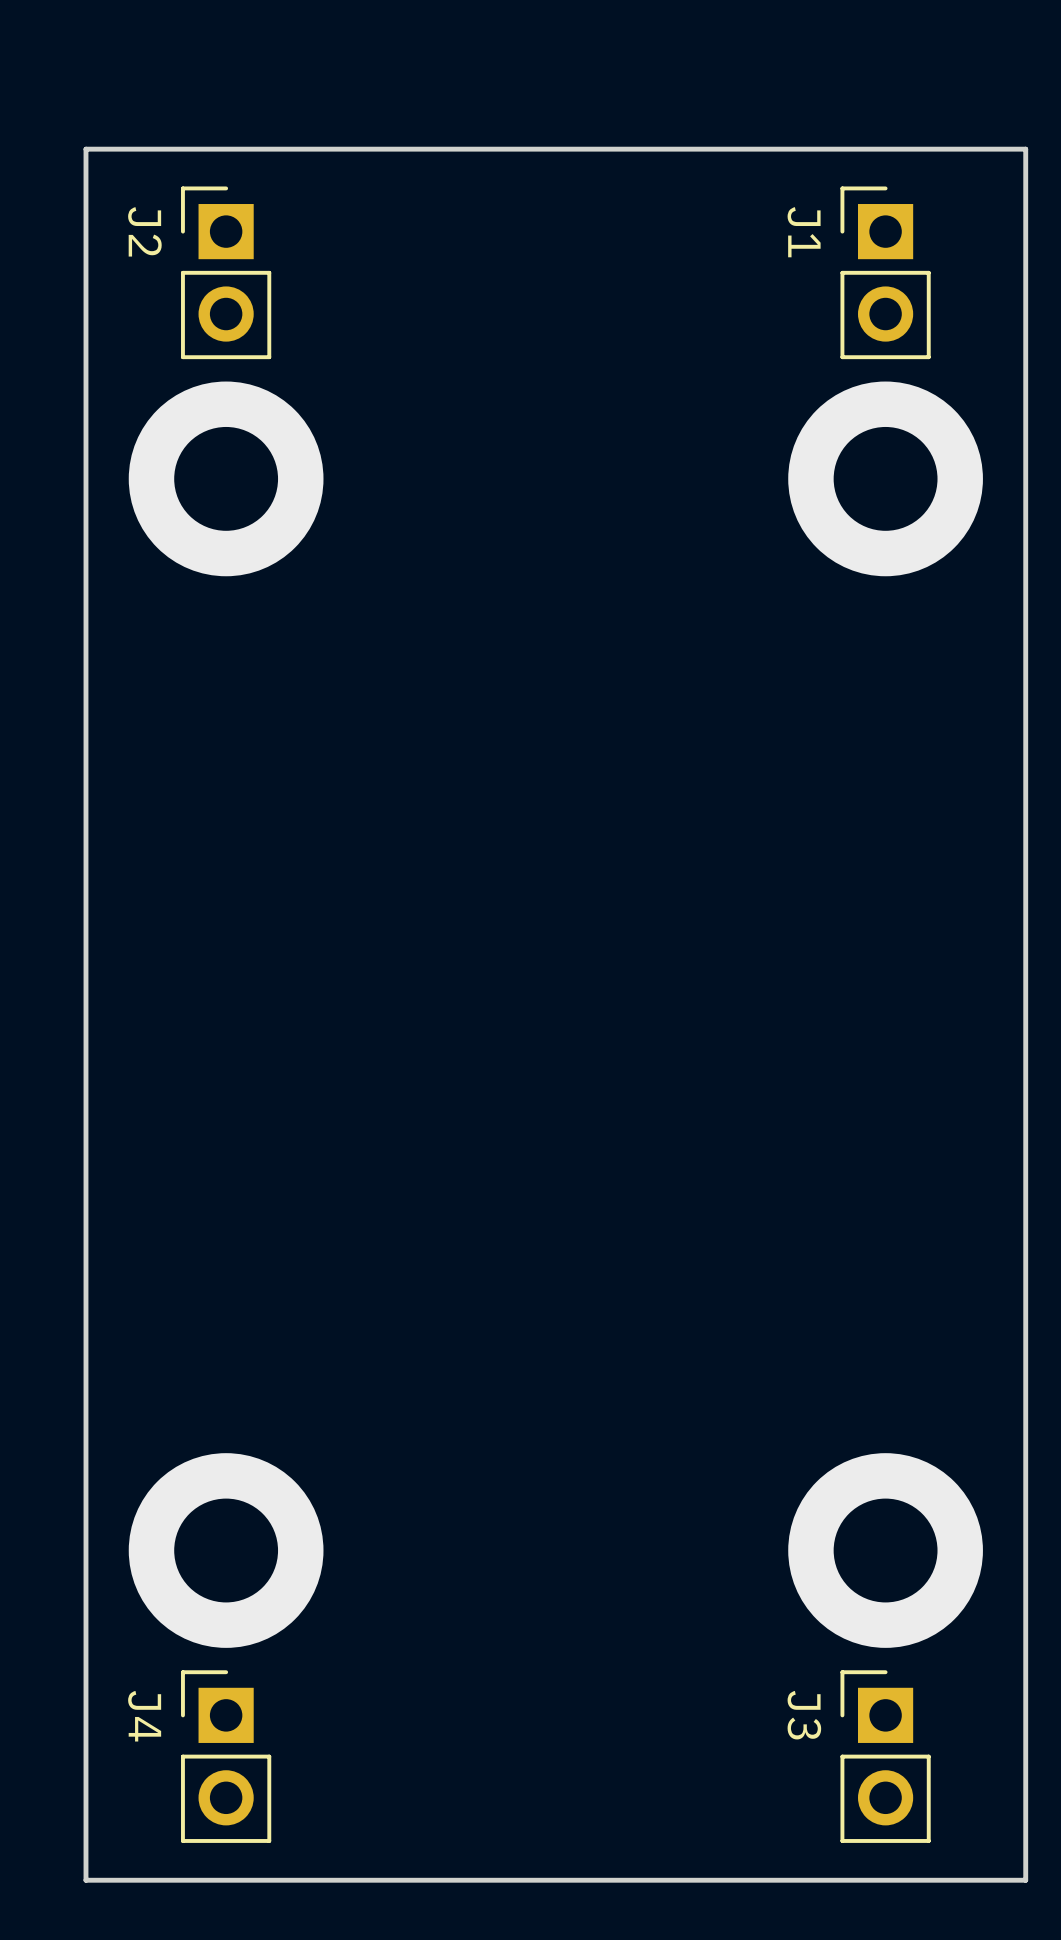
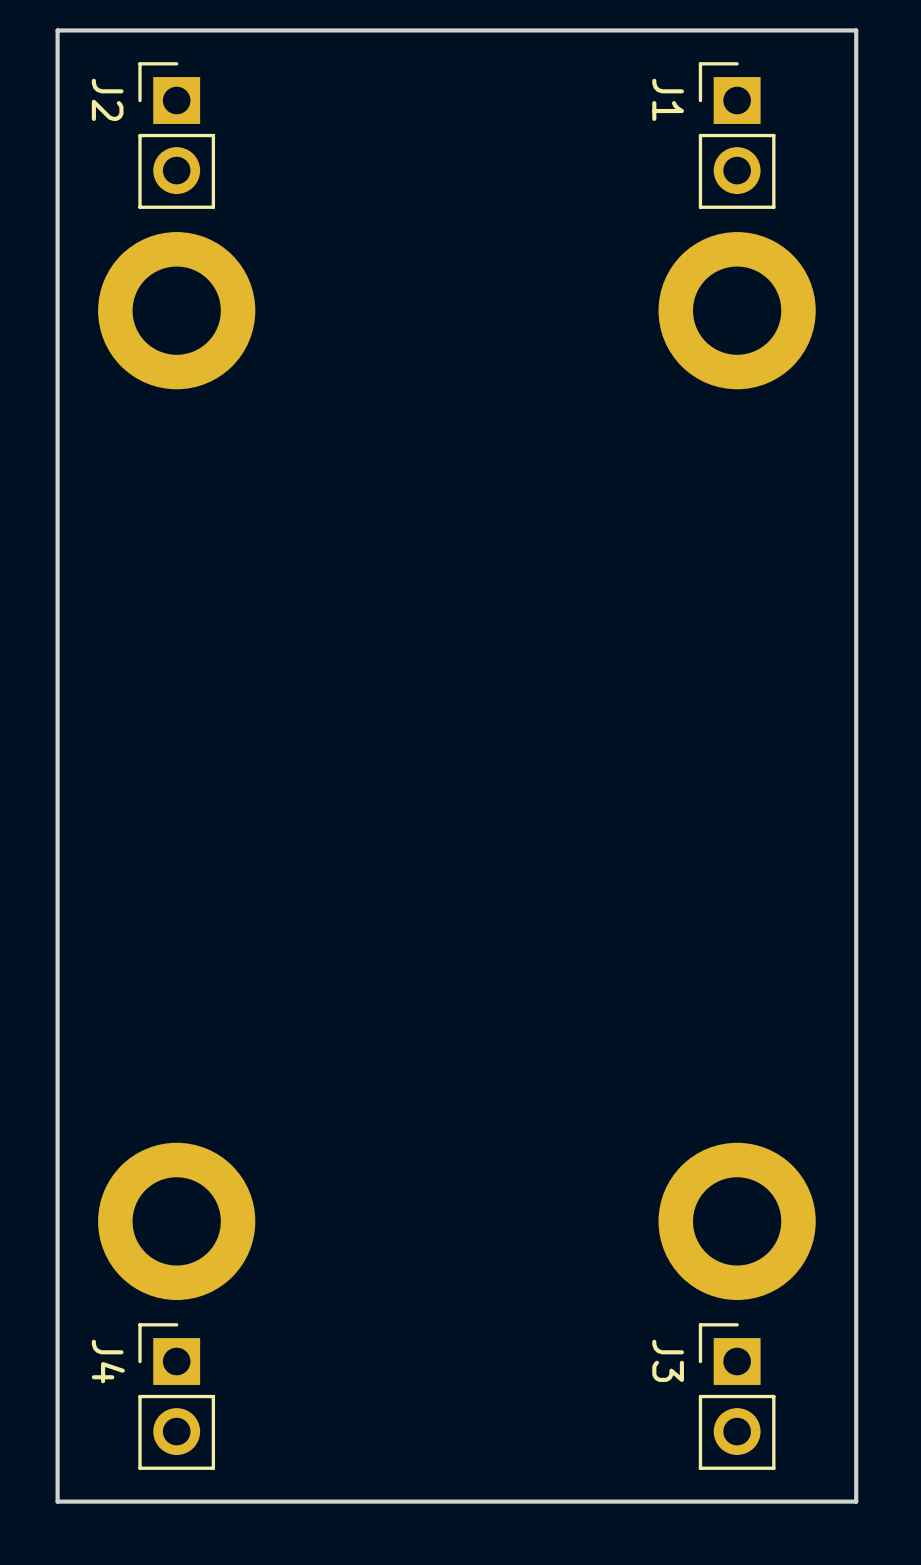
via: (226, 478) -> none
part: none -> (176, 310)
via: (885, 478) -> none
part: none -> (737, 310)
via: (226, 1550) -> none
part: none -> (176, 1221)
via: (885, 1550) -> none
part: none -> (737, 1221)

